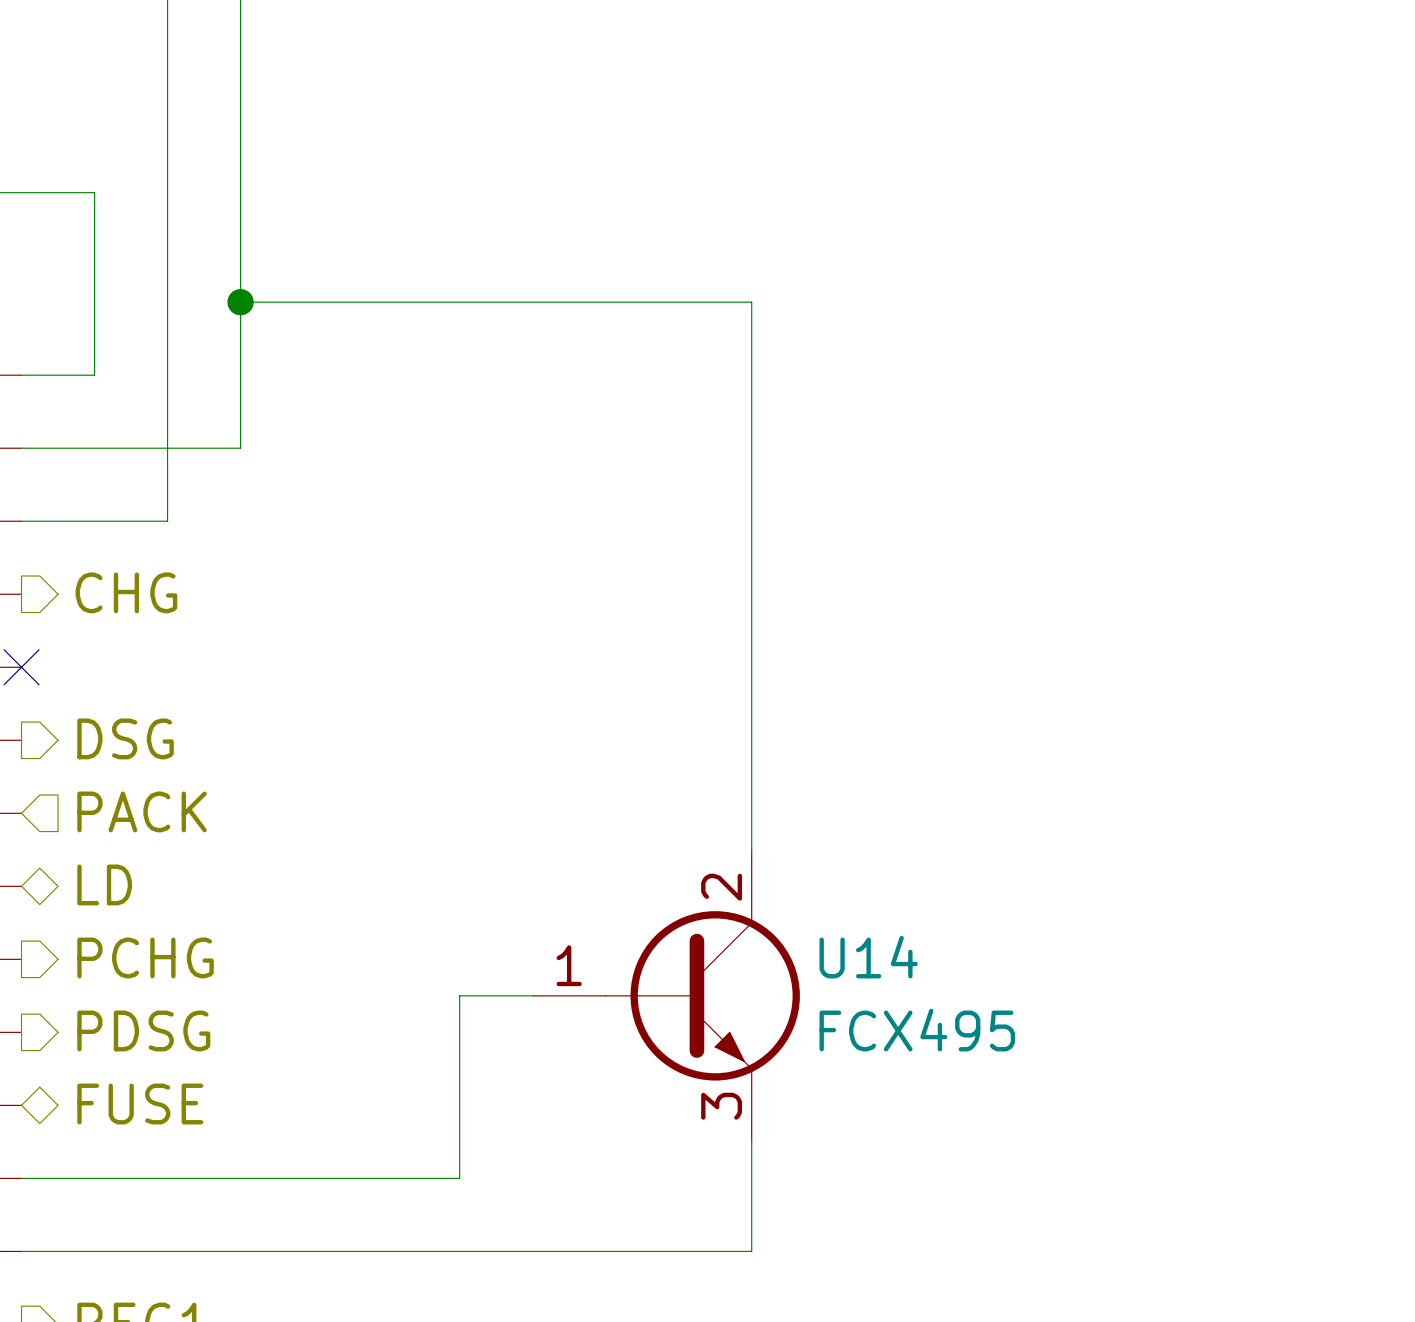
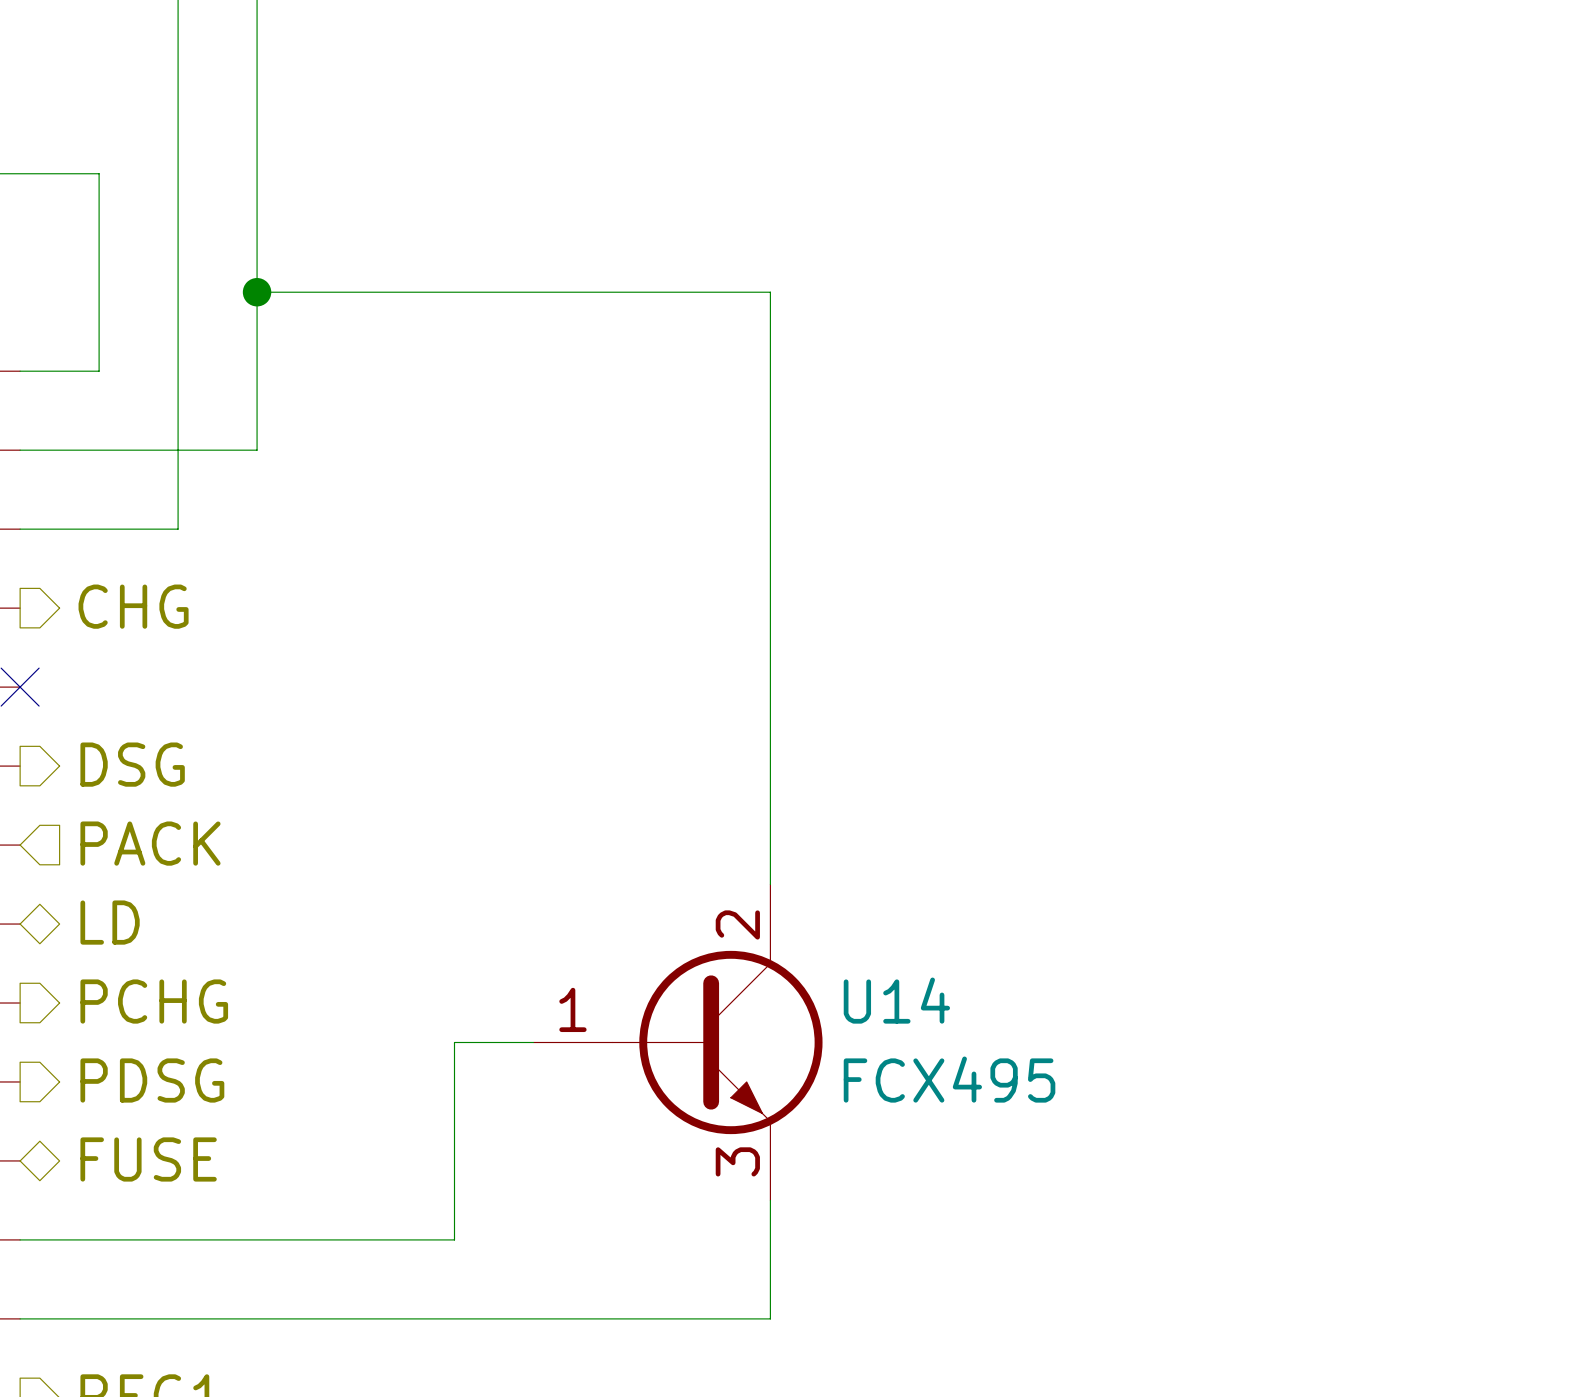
wire: (715, 302) (751, 302) (751, 849) -> (770, 292) (770, 884)
wire: (459, 995) (459, 1178) (423, 1178) -> (493, 1042) (454, 1042) (454, 1239)
U14 position: (666, 995) -> (678, 1042)
wire: (751, 1141) (751, 1251) (715, 1251) -> (770, 1200) (770, 1318)

